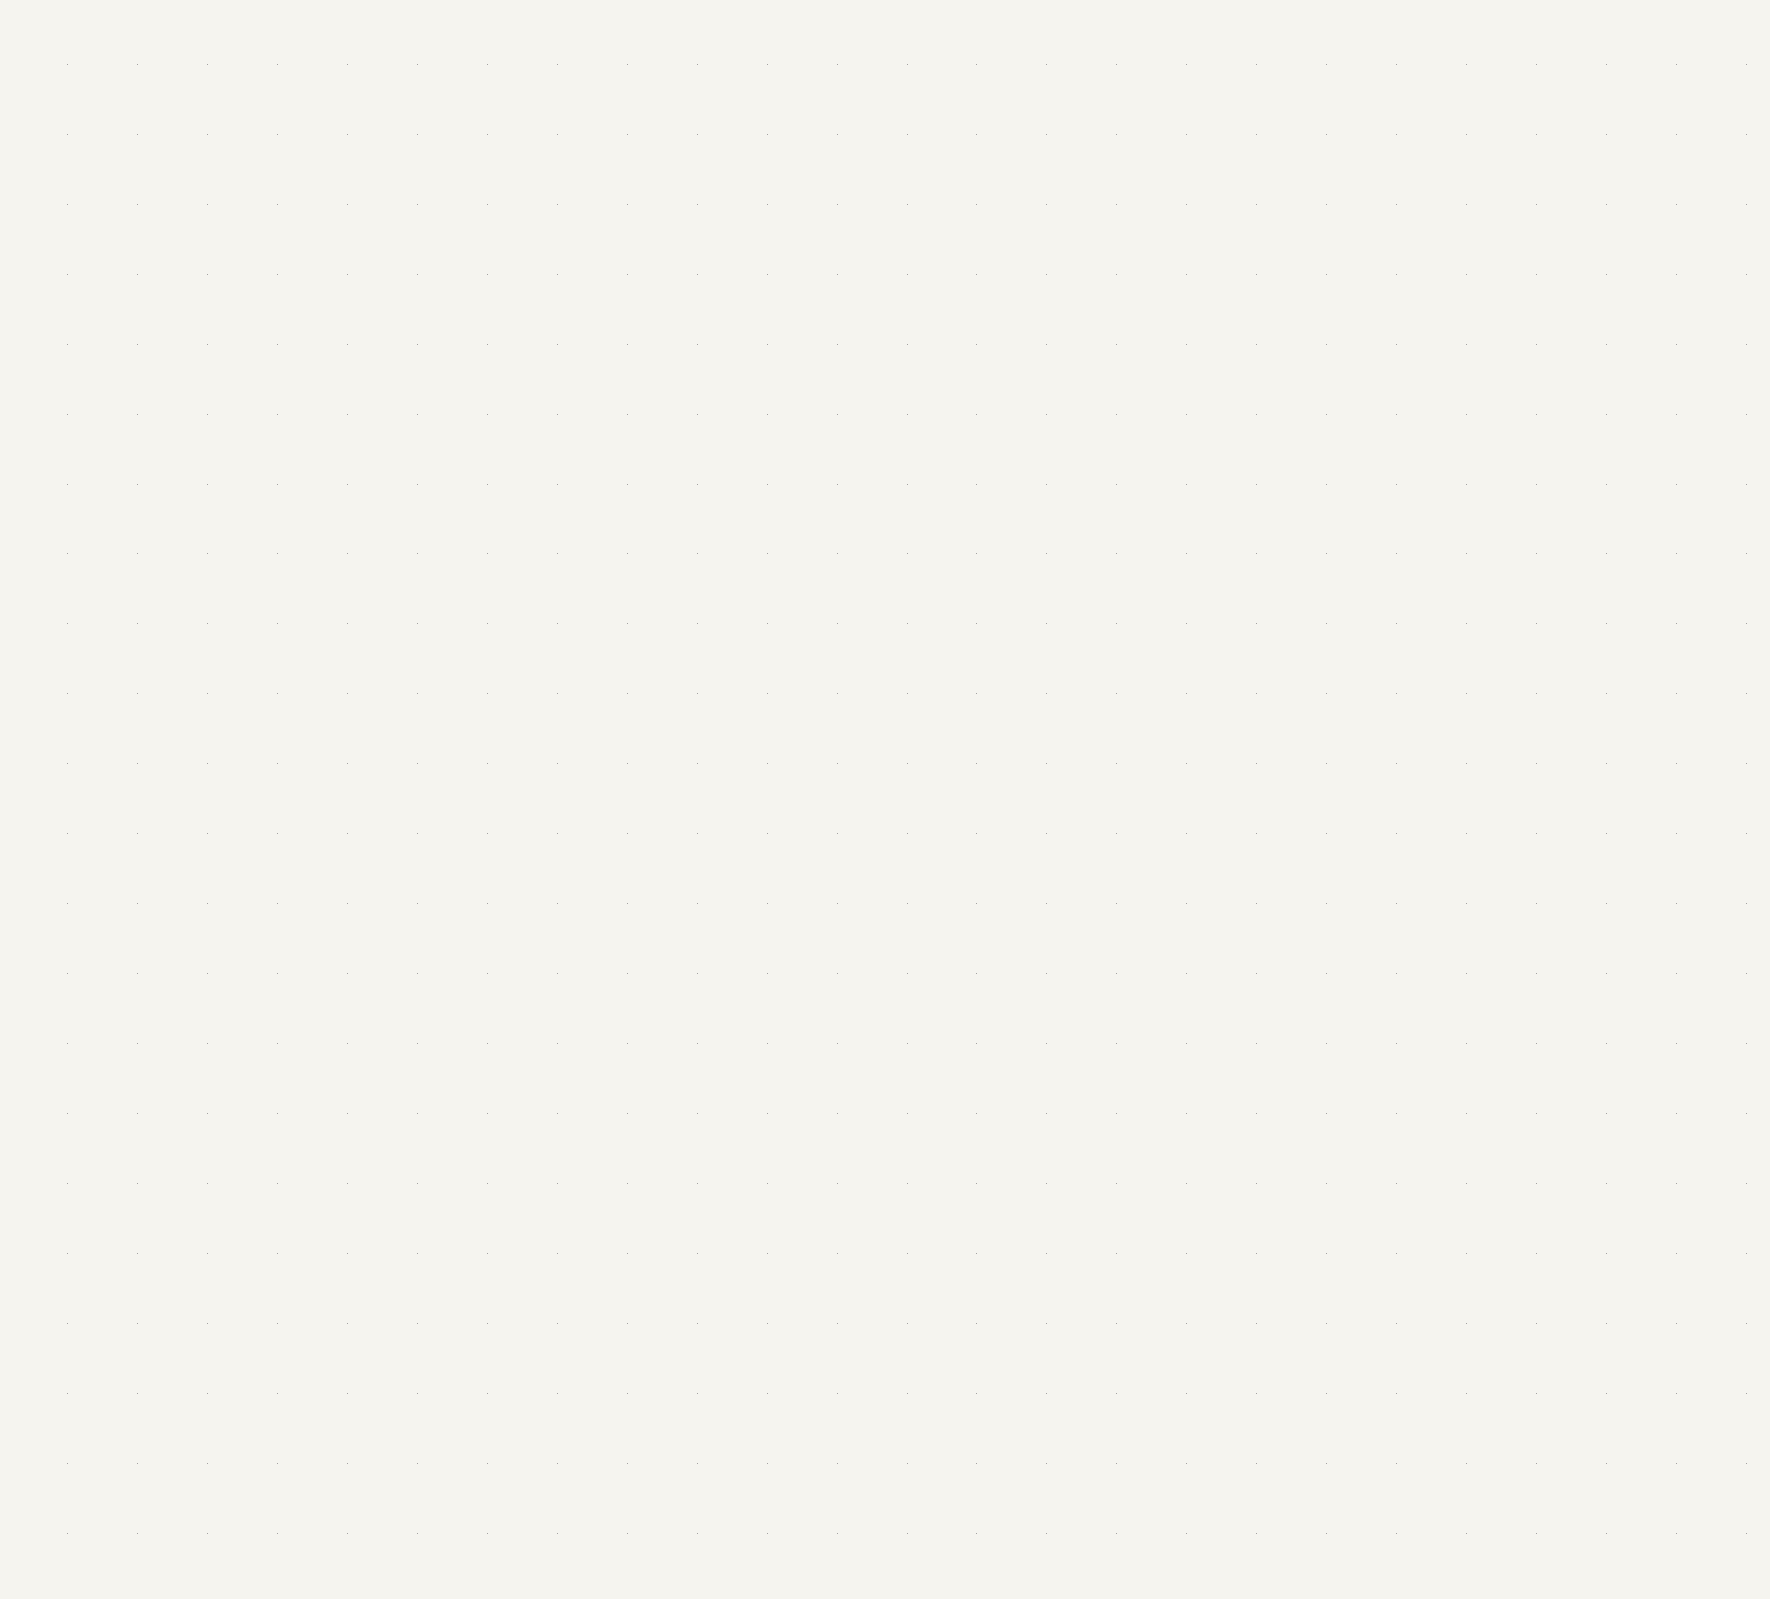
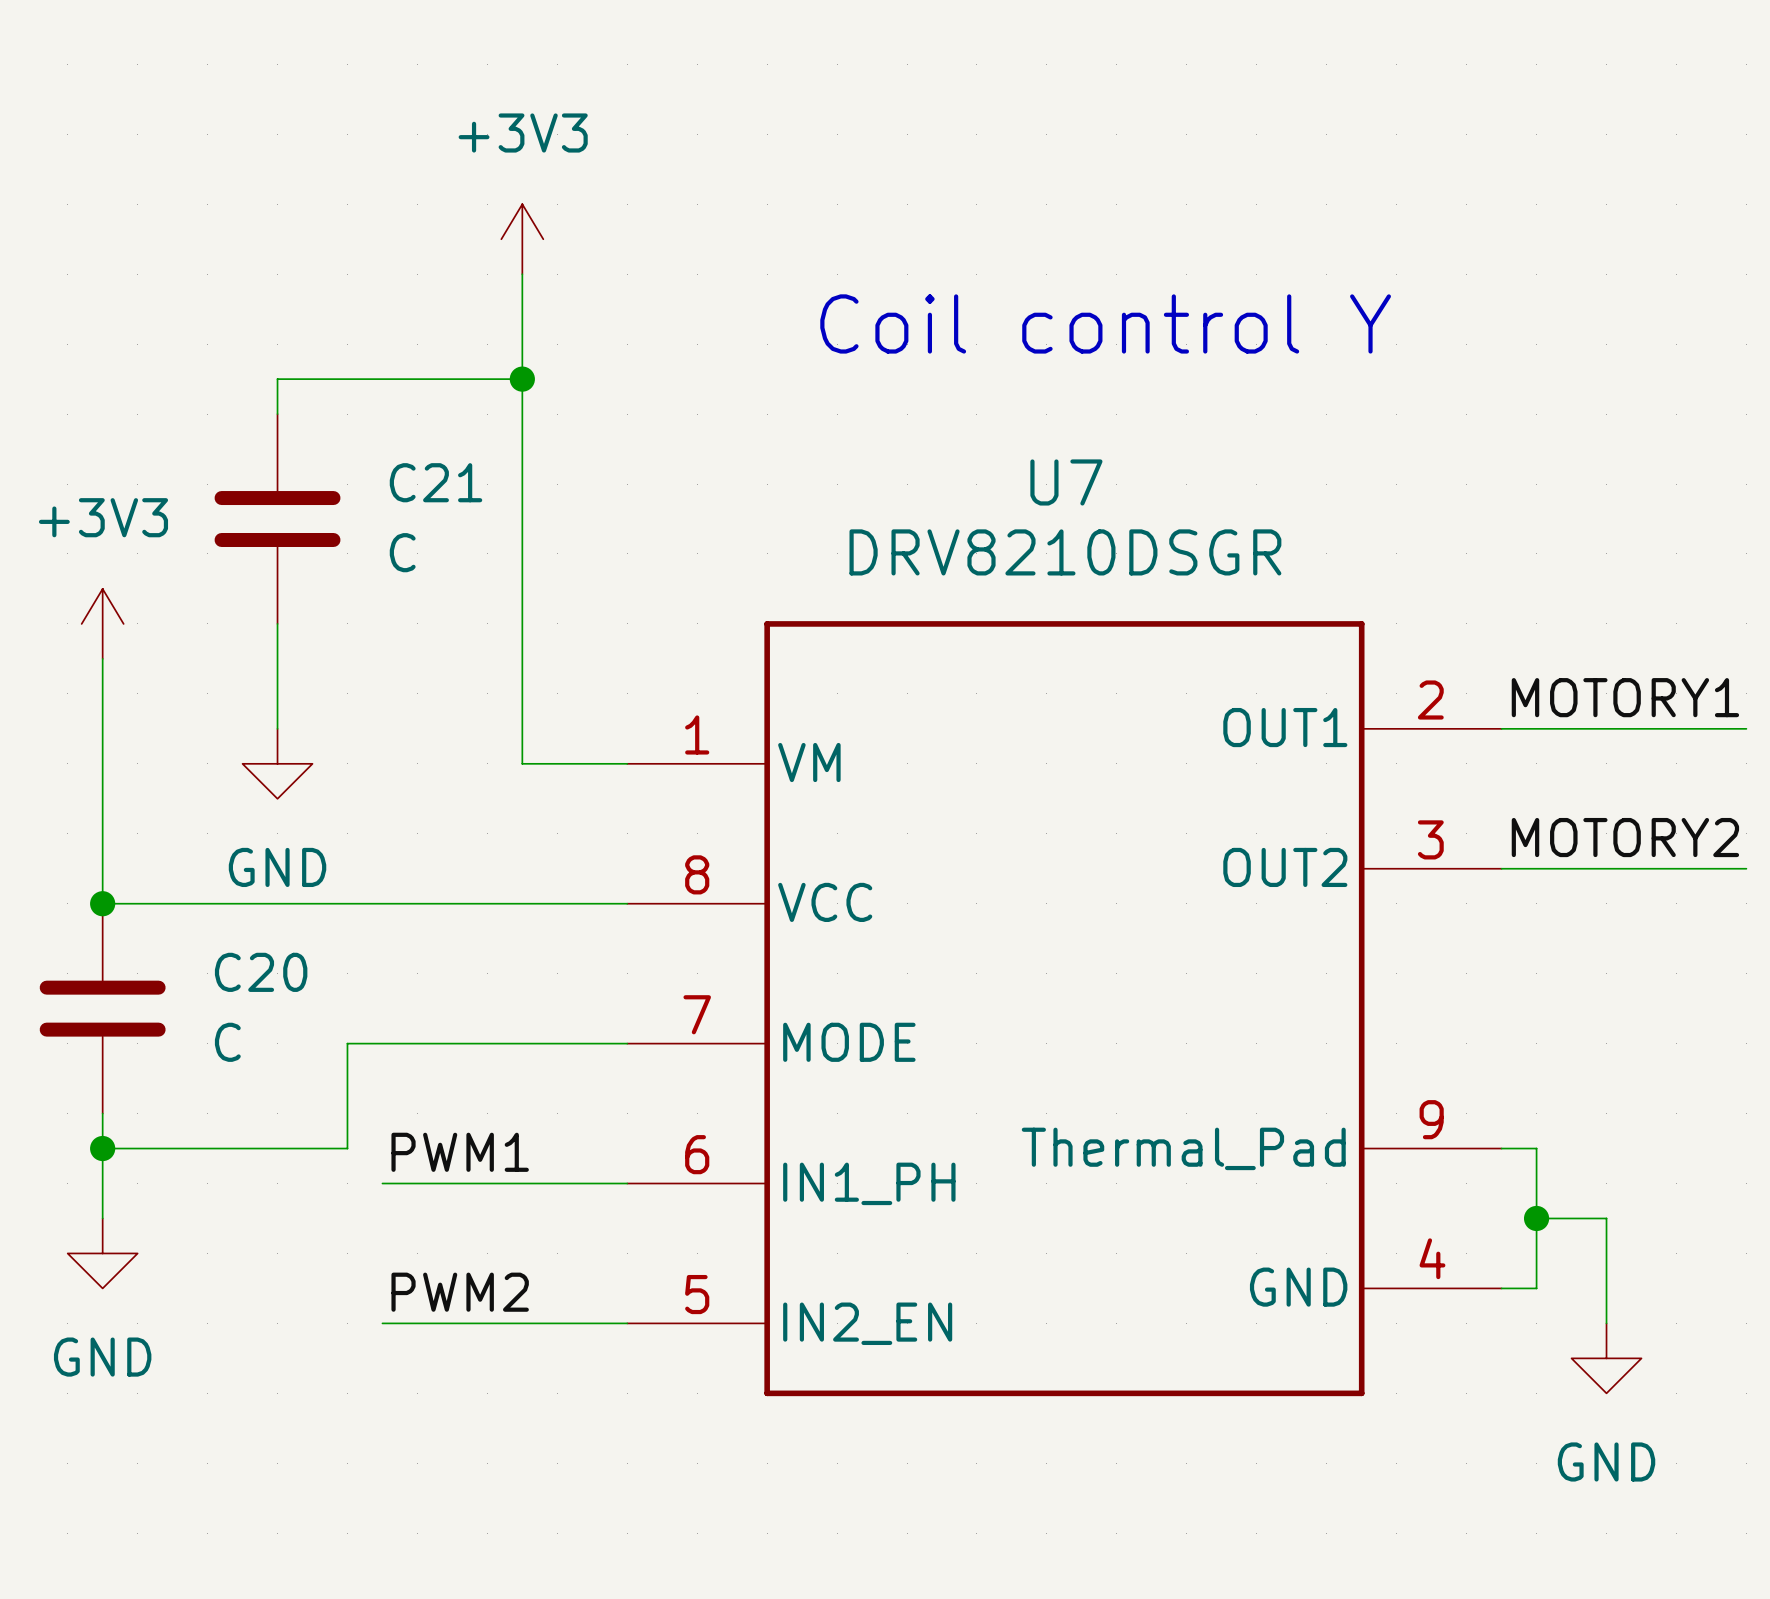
power symbol: none -> +3V3 (522, 239)
wire: none -> (522, 274) (522, 763) (627, 763)
text: none -> Coil control Y (1105, 323)
wire: none -> (522, 379) (277, 379) (277, 414)
junction: none -> (522, 379)
C21: none -> C (277, 519)
power symbol: none -> +3V3 (102, 623)
wire: none -> (277, 623) (277, 728)
wire: none -> (102, 658) (102, 903) (627, 903)
label: none -> MOTORY1 (1625, 697)
wire: none -> (1501, 728) (1746, 728)
power symbol: none -> GND (277, 763)
label: none -> MOTORY2 (1625, 837)
wire: none -> (1501, 868) (1746, 868)
junction: none -> (102, 903)
C20: none -> C (102, 1008)
U7: none -> DRV8210DSGR (1064, 1008)
wire: none -> (627, 1043) (347, 1043) (347, 1148) (102, 1148)
wire: none -> (102, 1113) (102, 1218)
junction: none -> (102, 1148)
wire: none -> (1501, 1148) (1536, 1148) (1536, 1288) (1501, 1288)
label: none -> PWM1 (460, 1152)
wire: none -> (382, 1183) (627, 1183)
wire: none -> (1536, 1218) (1606, 1218) (1606, 1323)
junction: none -> (1536, 1218)
power symbol: none -> GND (102, 1253)
label: none -> PWM2 (460, 1292)
wire: none -> (382, 1323) (627, 1323)
power symbol: none -> GND (1606, 1358)

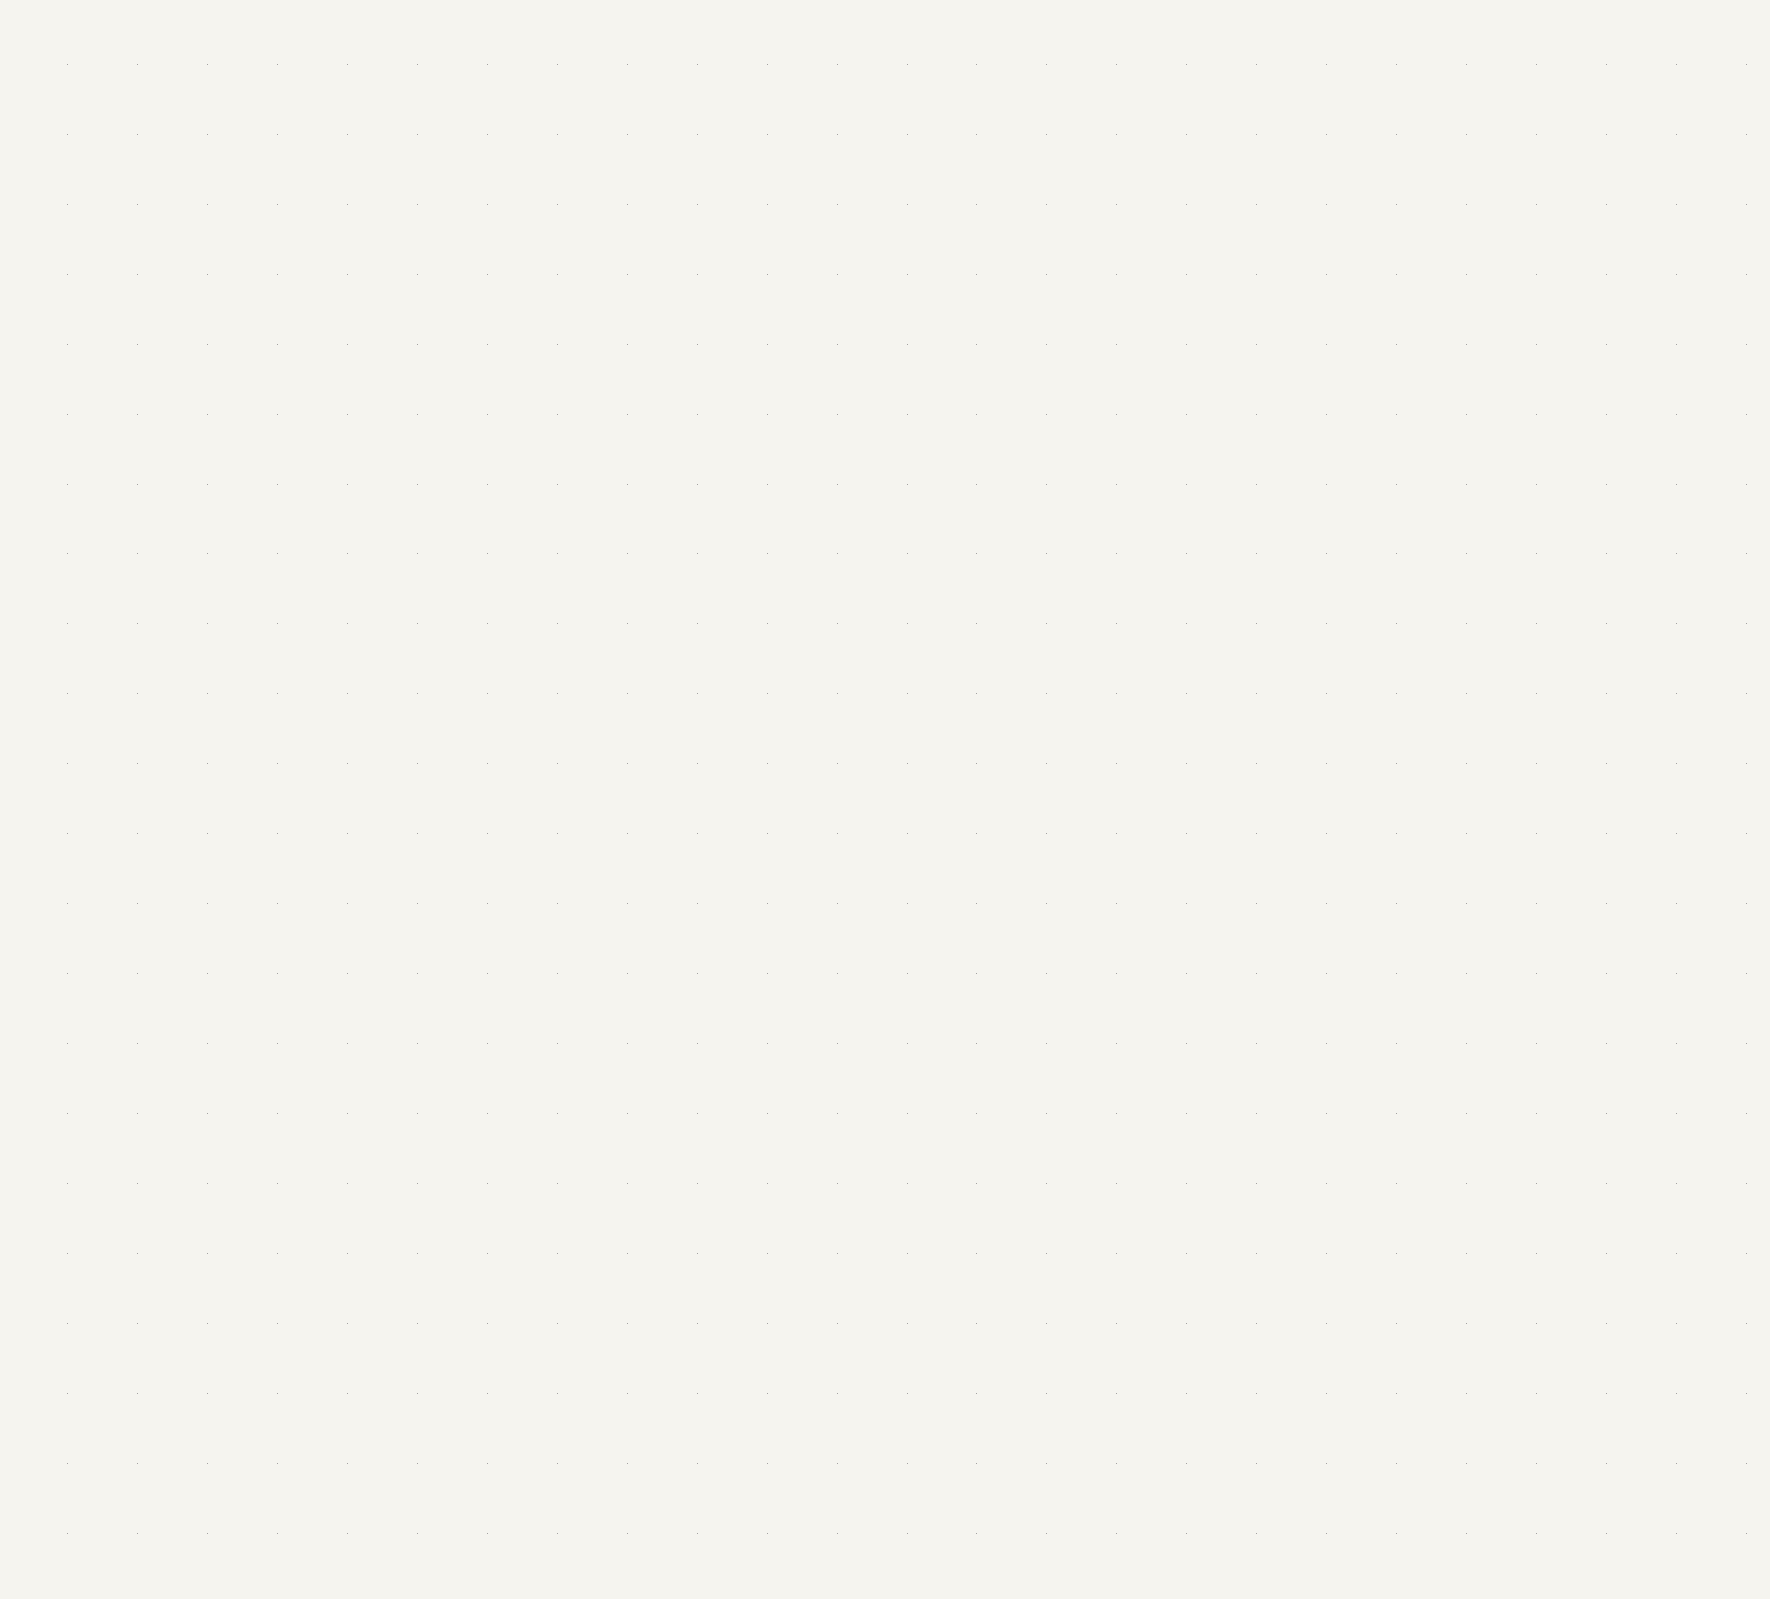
power symbol: +3V3 (522, 239) -> none
wire: (522, 274) (522, 763) (627, 763) -> none
text: Coil control Y (1105, 323) -> none
wire: (522, 379) (277, 379) (277, 414) -> none
junction: (522, 379) -> none
C21: C (277, 519) -> none
power symbol: +3V3 (102, 623) -> none
wire: (277, 623) (277, 728) -> none
wire: (102, 658) (102, 903) (627, 903) -> none
label: MOTORY1 (1625, 697) -> none
wire: (1501, 728) (1746, 728) -> none
power symbol: GND (277, 763) -> none
label: MOTORY2 (1625, 837) -> none
wire: (1501, 868) (1746, 868) -> none
junction: (102, 903) -> none
C20: C (102, 1008) -> none
U7: DRV8210DSGR (1064, 1008) -> none
wire: (627, 1043) (347, 1043) (347, 1148) (102, 1148) -> none
wire: (102, 1113) (102, 1218) -> none
junction: (102, 1148) -> none
wire: (1501, 1148) (1536, 1148) (1536, 1288) (1501, 1288) -> none
label: PWM1 (460, 1152) -> none
wire: (382, 1183) (627, 1183) -> none
wire: (1536, 1218) (1606, 1218) (1606, 1323) -> none
junction: (1536, 1218) -> none
power symbol: GND (102, 1253) -> none
label: PWM2 (460, 1292) -> none
wire: (382, 1323) (627, 1323) -> none
power symbol: GND (1606, 1358) -> none

